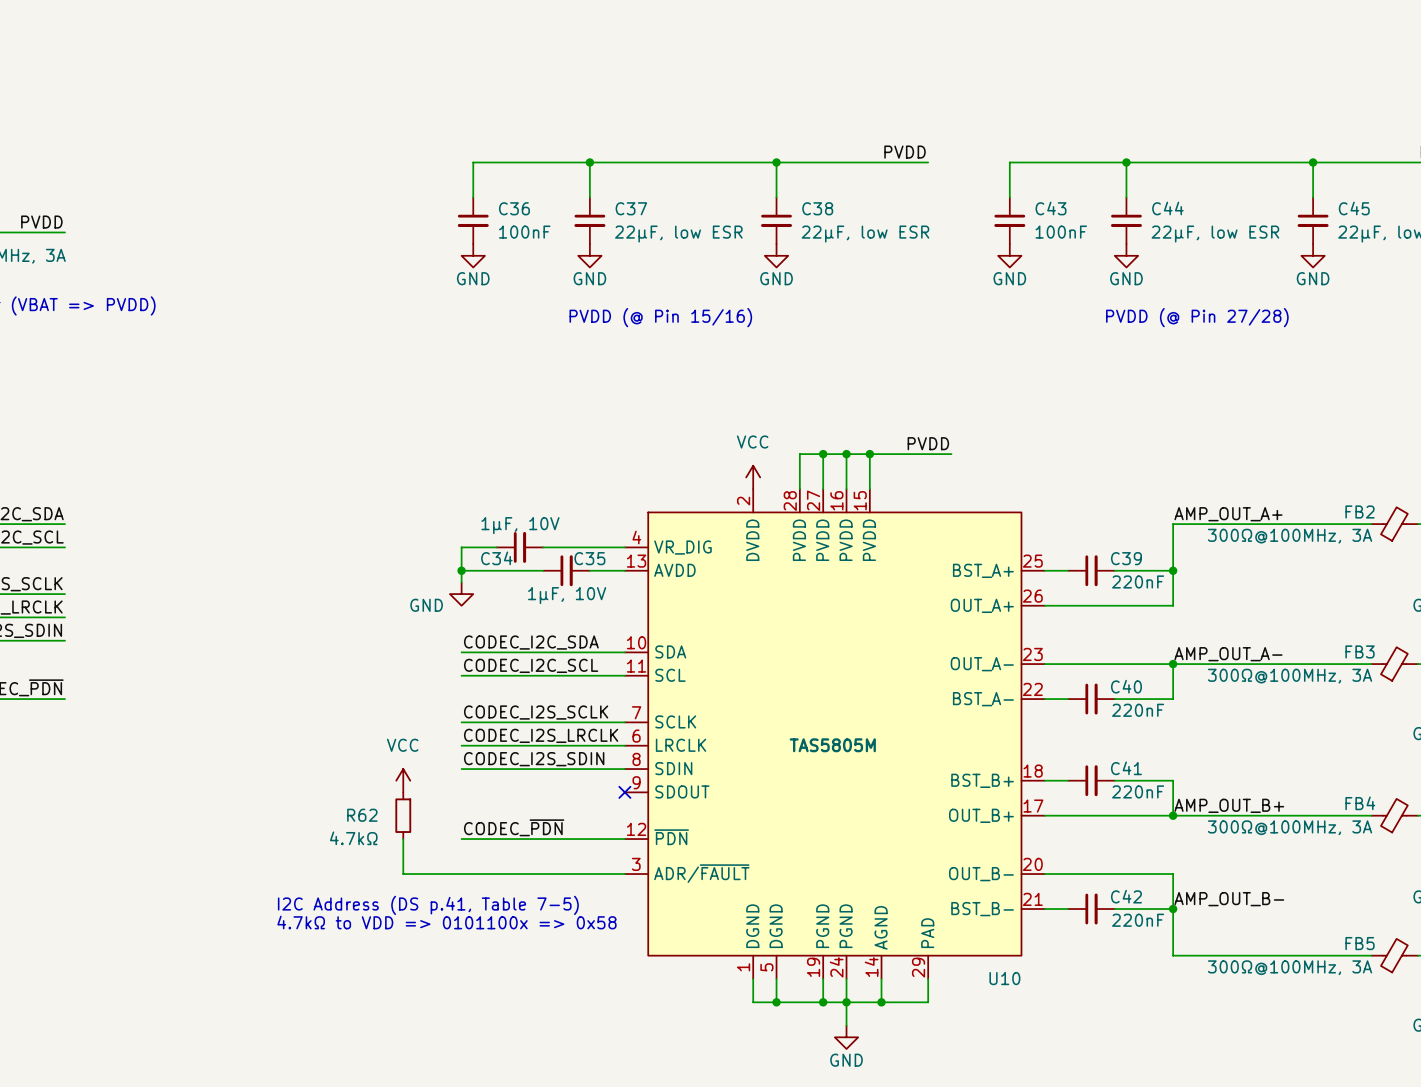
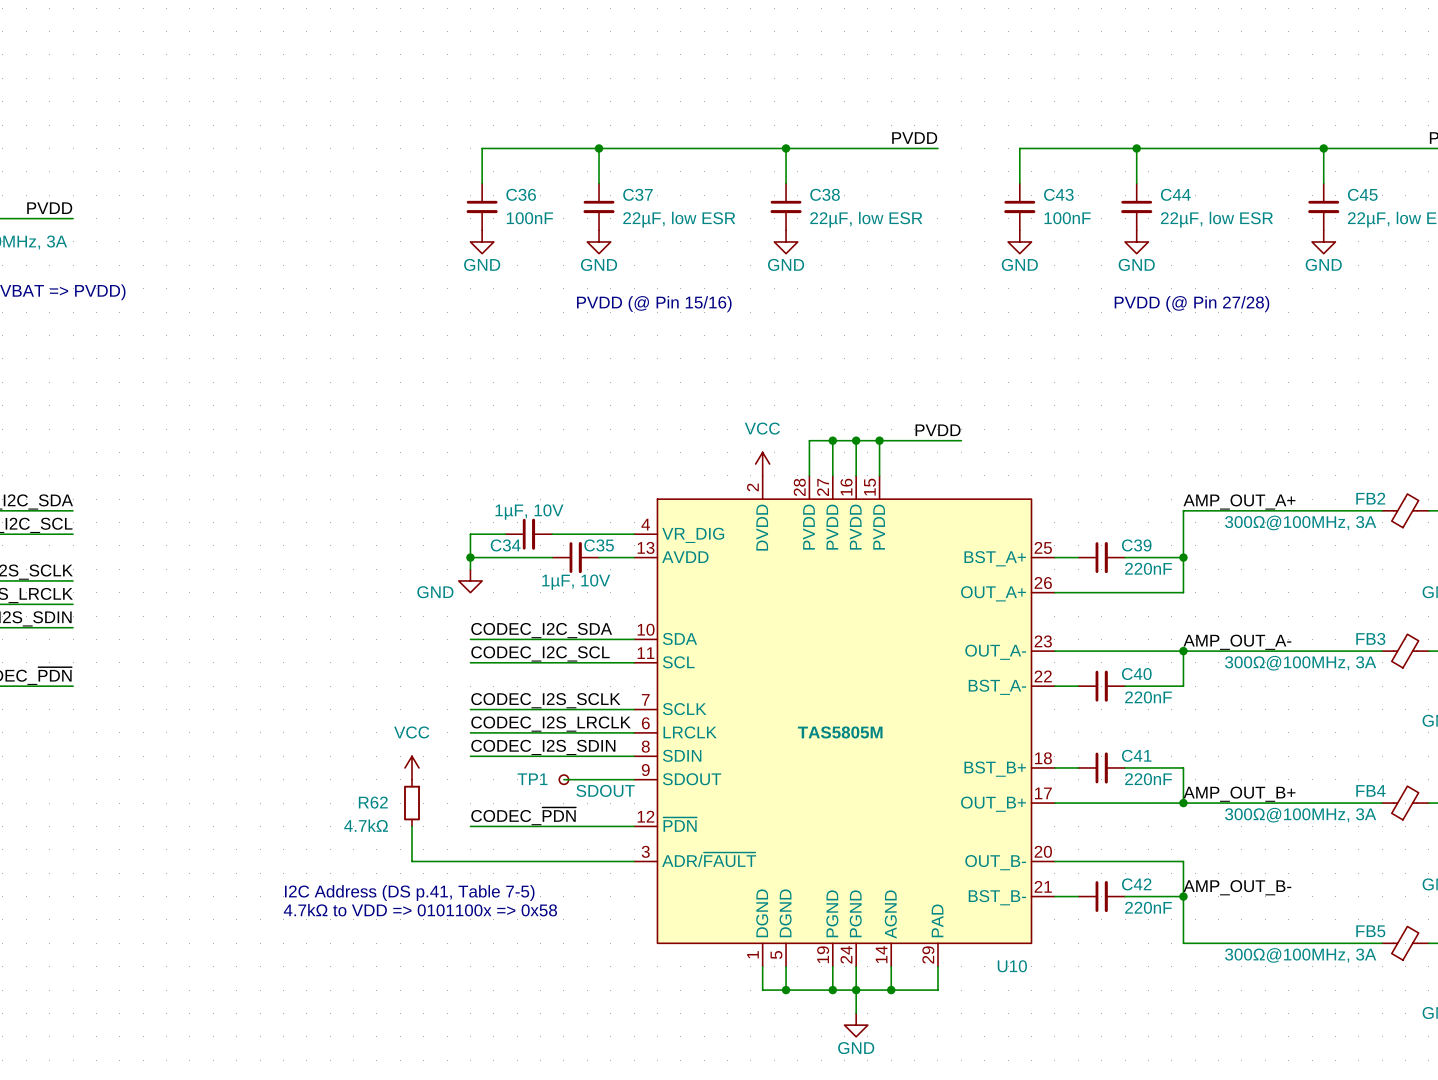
wire: none -> (563, 779) (634, 779)
TP1: none -> SDOUT (563, 779)
no-connect mark: (624, 792) -> none

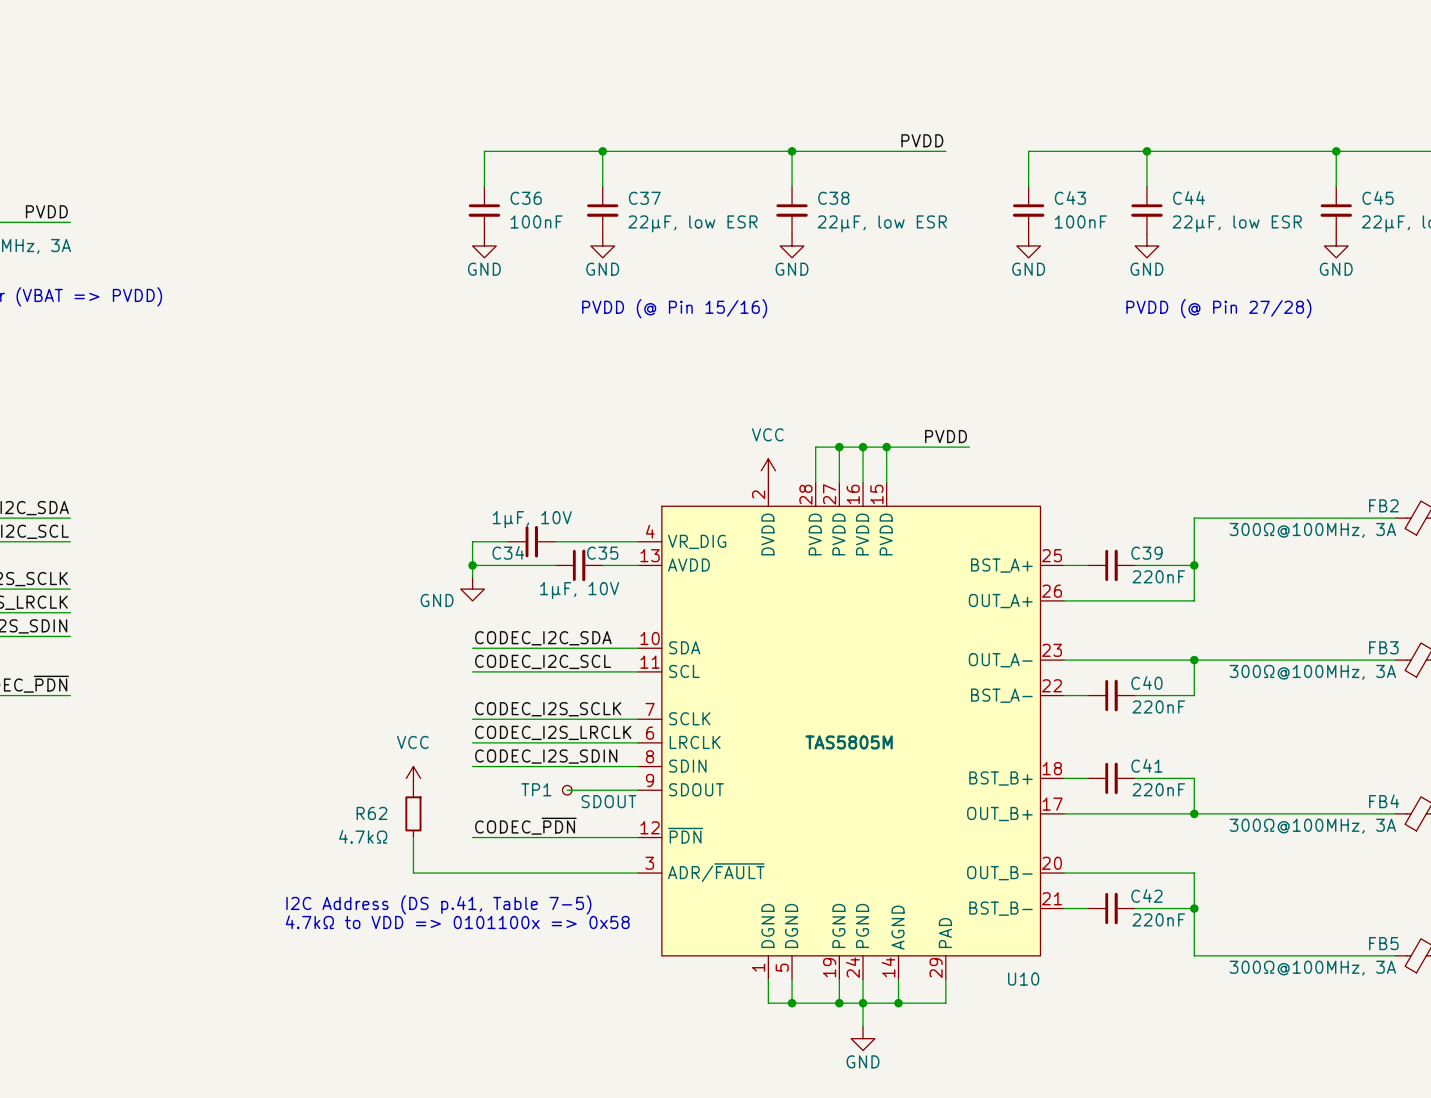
label: AMP_OUT_A+ (1239, 502) -> none
label: AMP_OUT_A- (1237, 642) -> none
label: AMP_OUT_B+ (1239, 794) -> none
label: AMP_OUT_B- (1237, 887) -> none

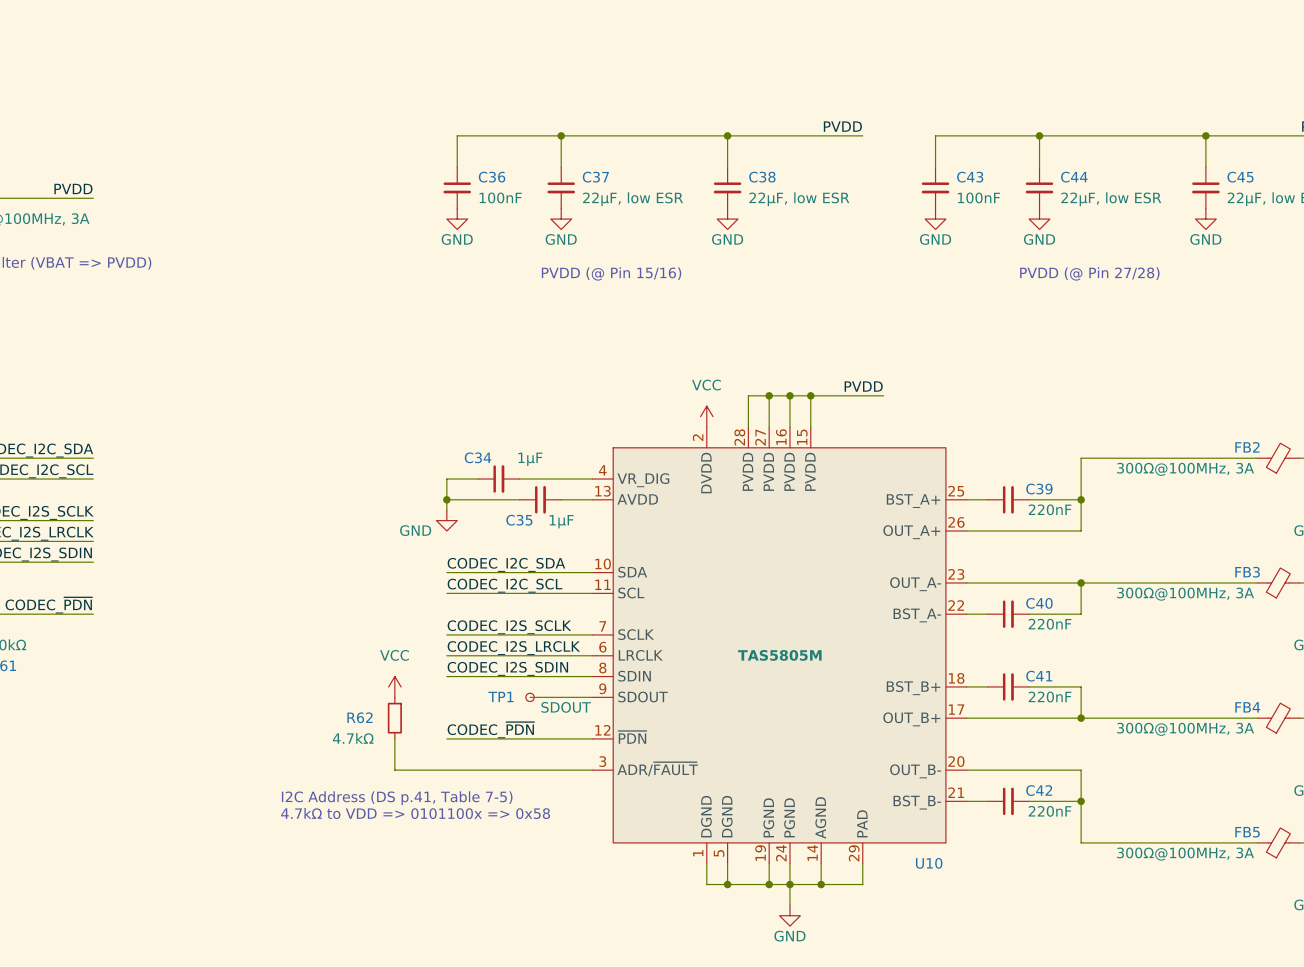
C34 value: 1µF, 10V (532, 519) -> 1µF (530, 459)
C34 name position: C34 (508, 552) -> C34 (478, 457)
C35 name position: C35 (602, 553) -> C35 (519, 520)
C35 value: 1µF, 10V (579, 590) -> 1µF (561, 521)

